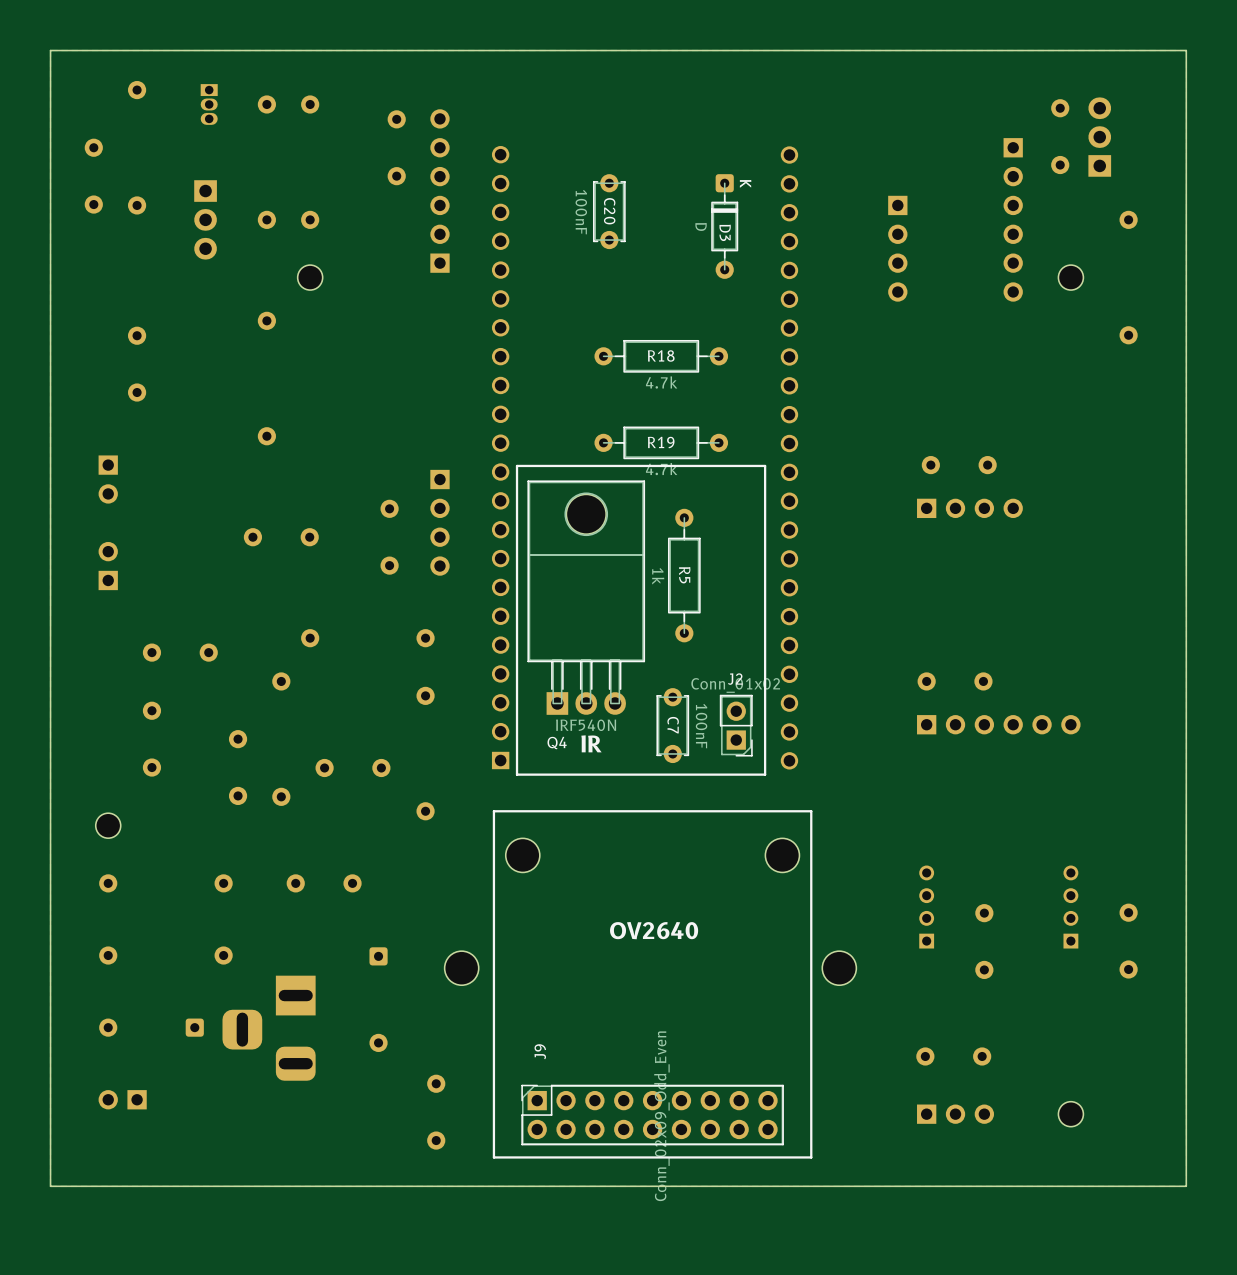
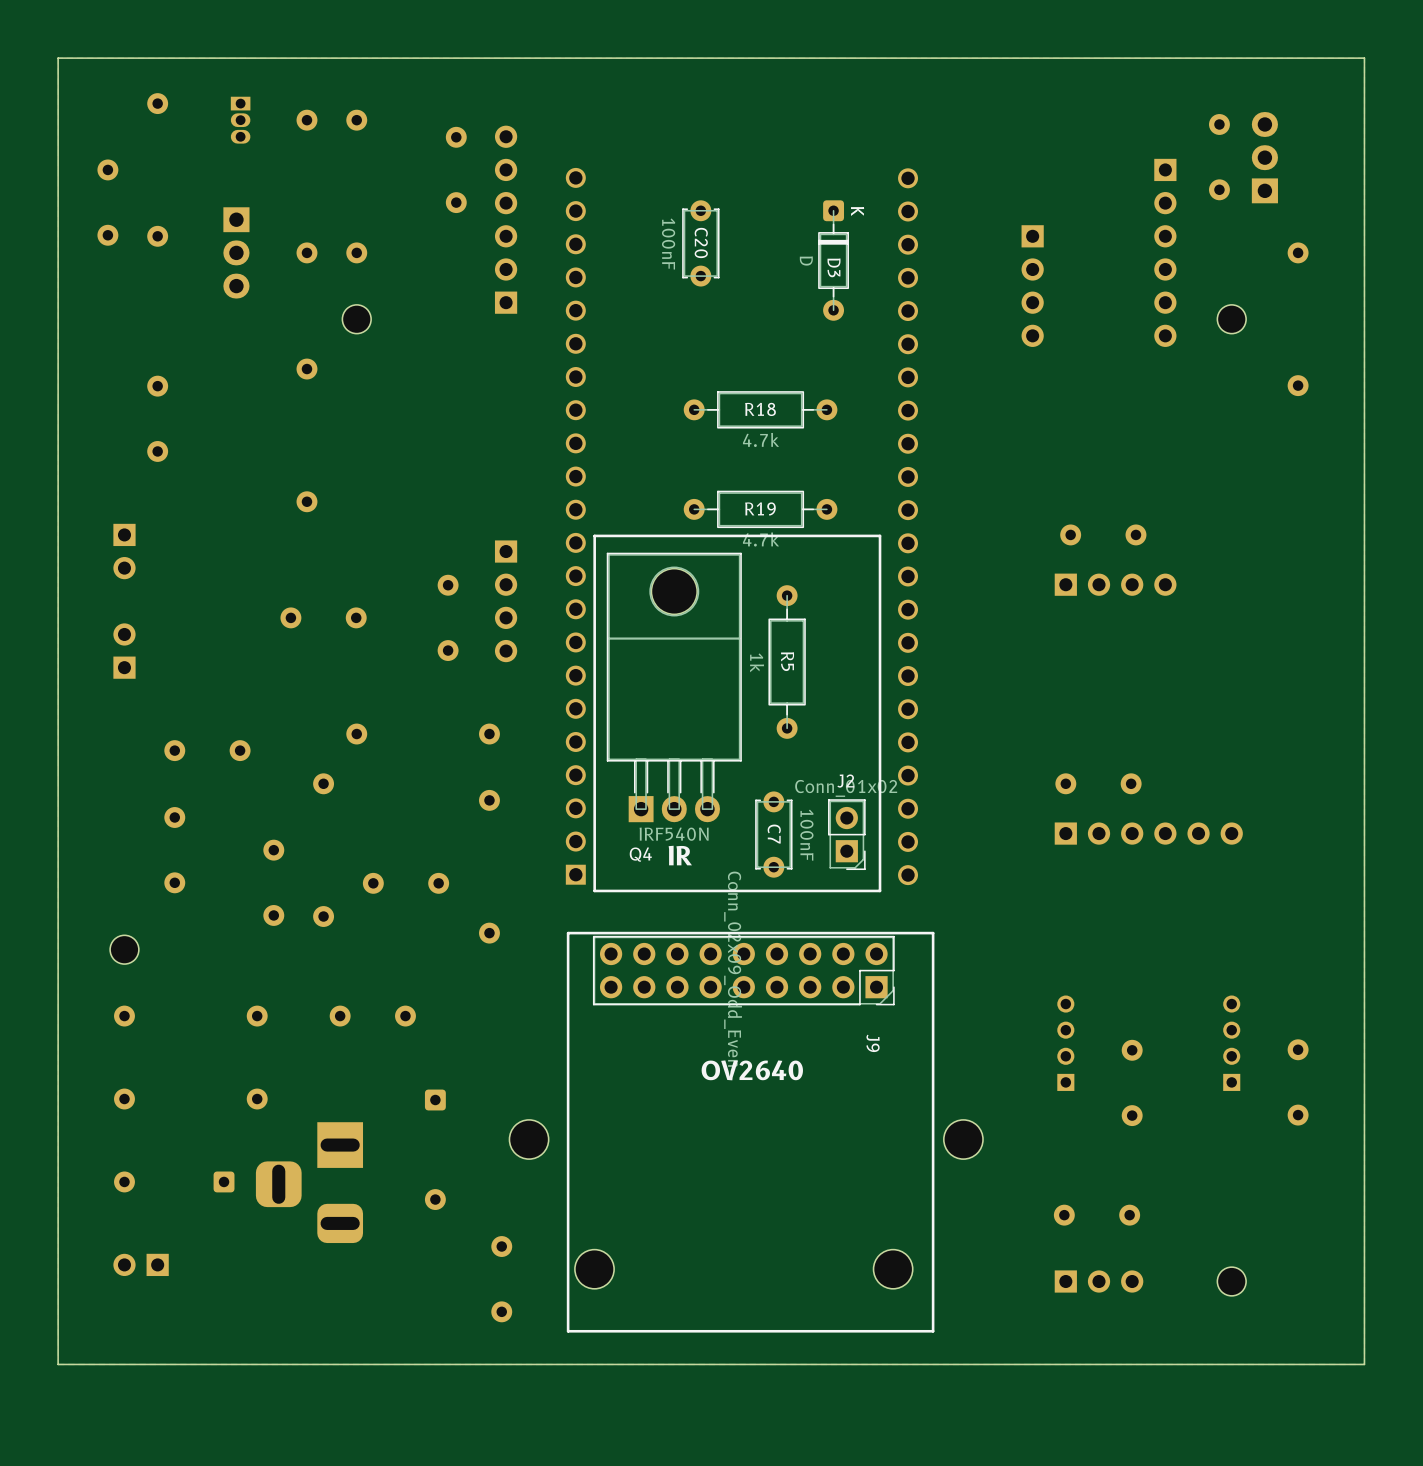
J9 rotation: 0° (650, 991) -> 180° (746, 1112)

